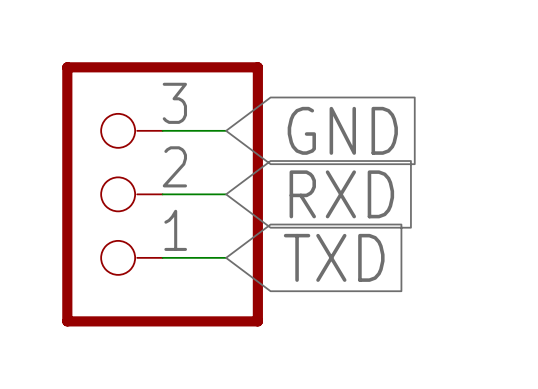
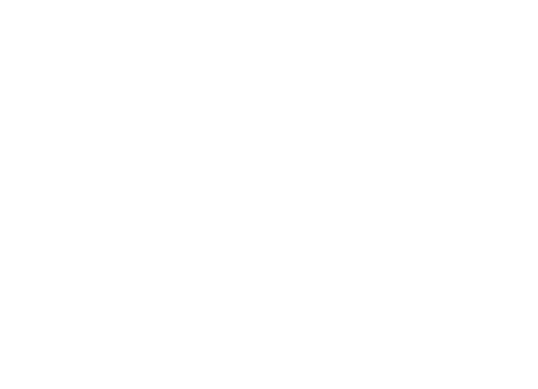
wire: (162, 130) (226, 130) -> none
global label: GND (342, 130) -> none
wire: (162, 194) (226, 194) -> none
part: (162, 194) -> none
global label: RXD (341, 194) -> none
wire: (162, 257) (226, 257) -> none
global label: TXD (334, 257) -> none

